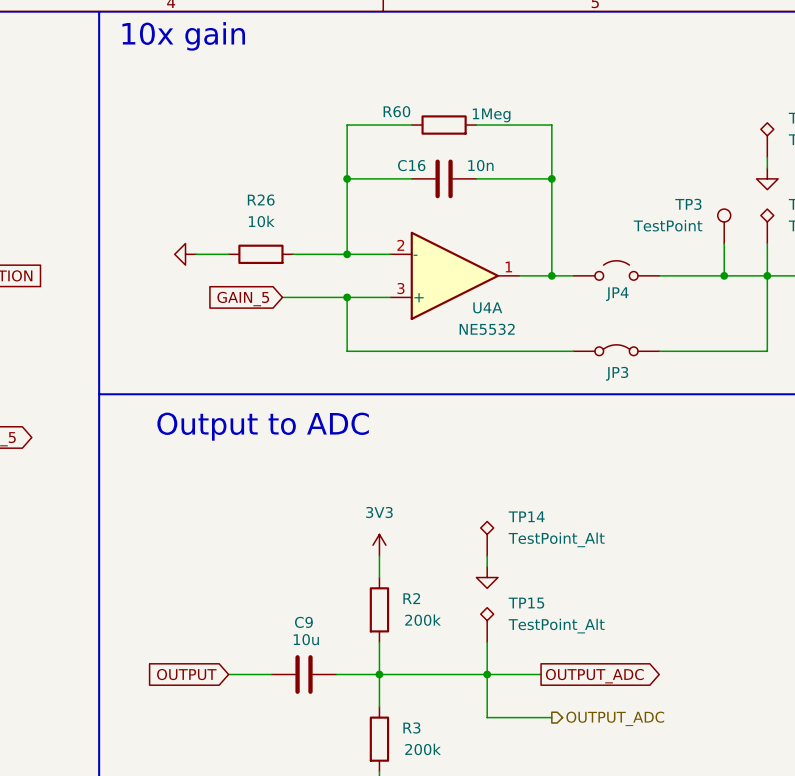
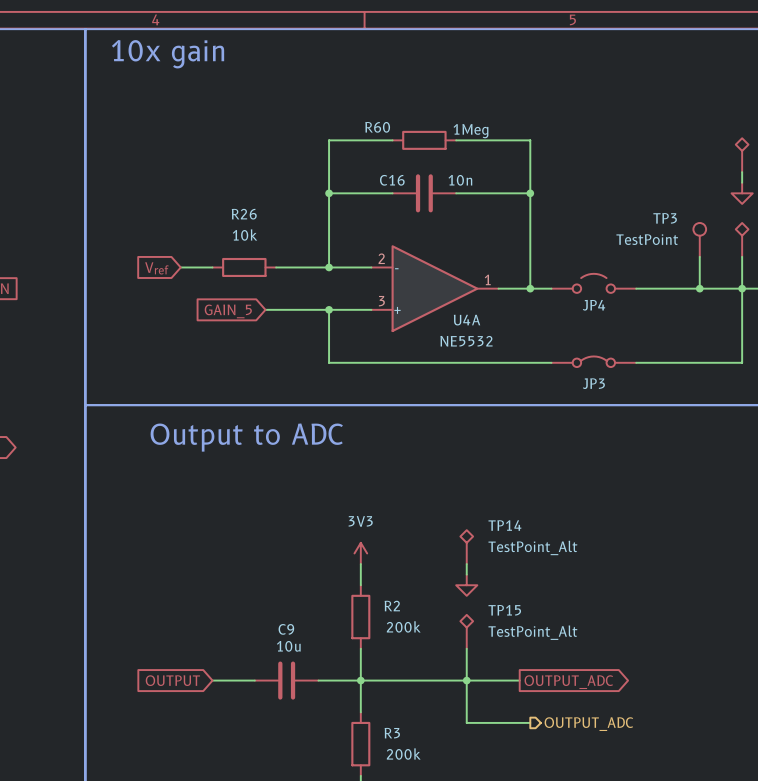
power symbol: (185, 254) -> none
global label: none -> Vref (156, 268)

